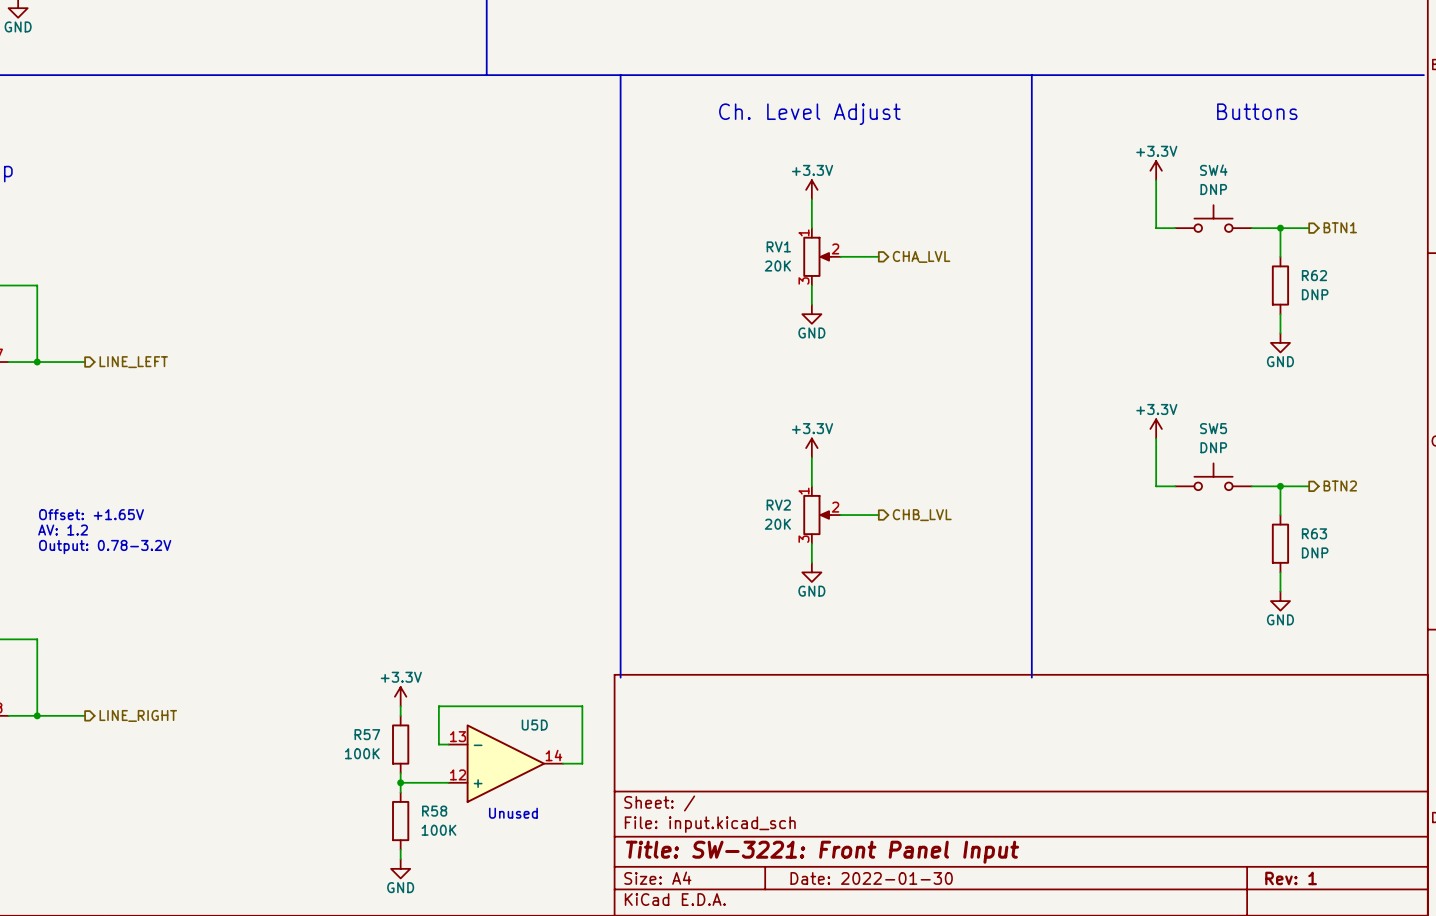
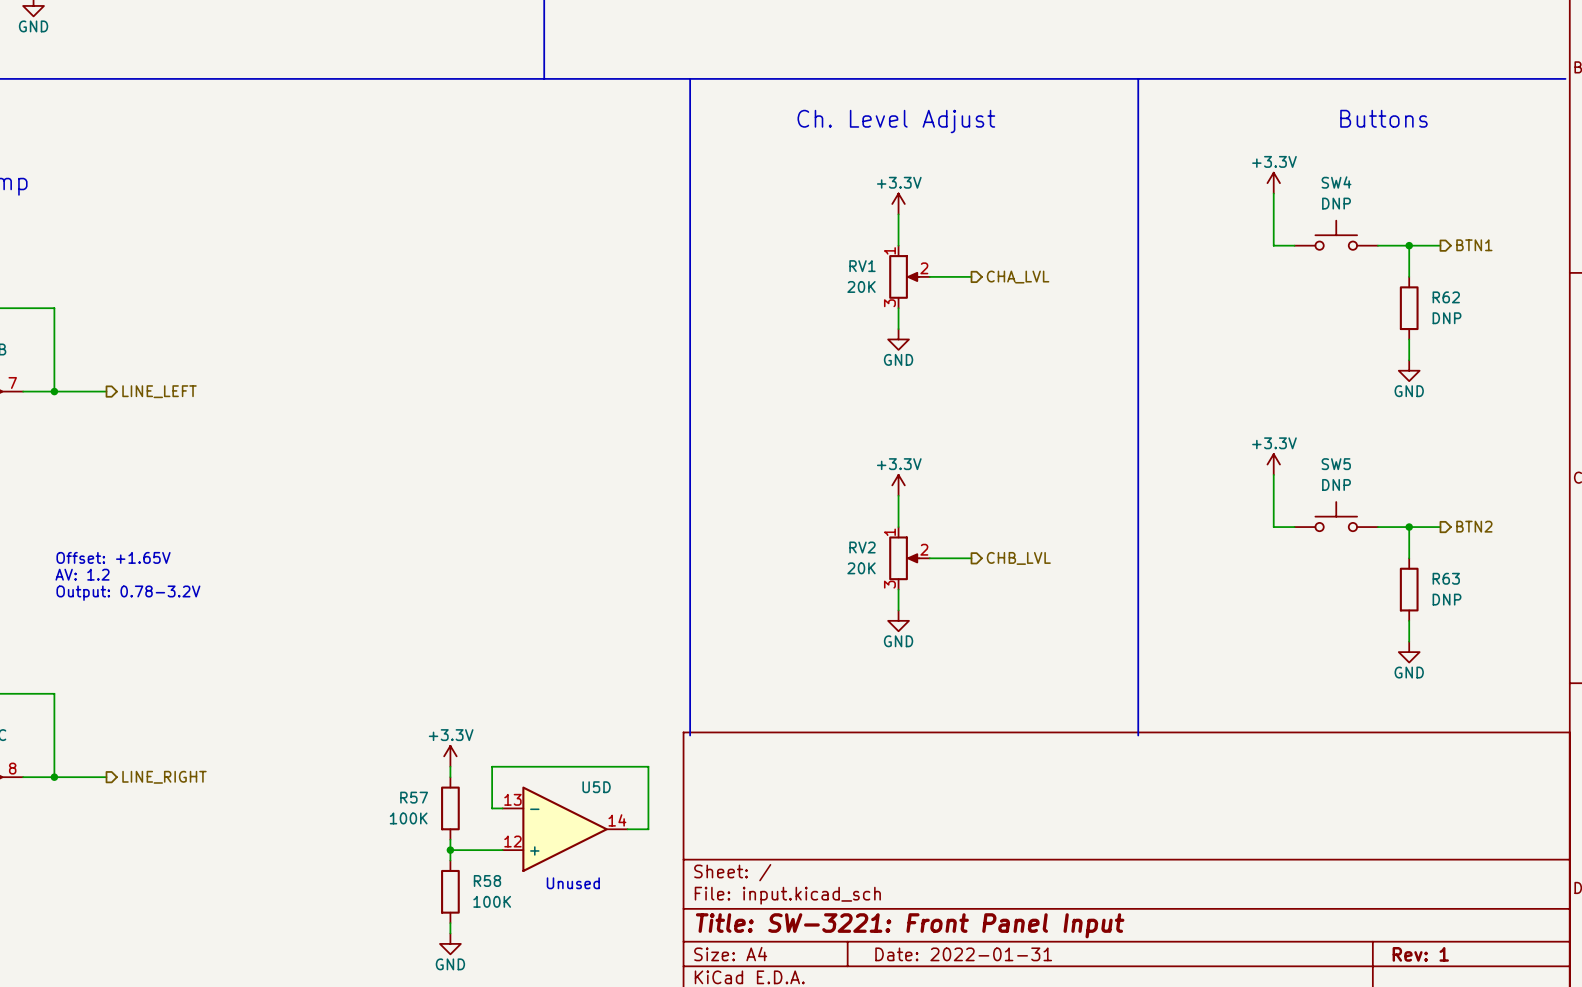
title block: Date: 2022-01-30 (871, 878) -> Date: 2022-01-31 (963, 954)

